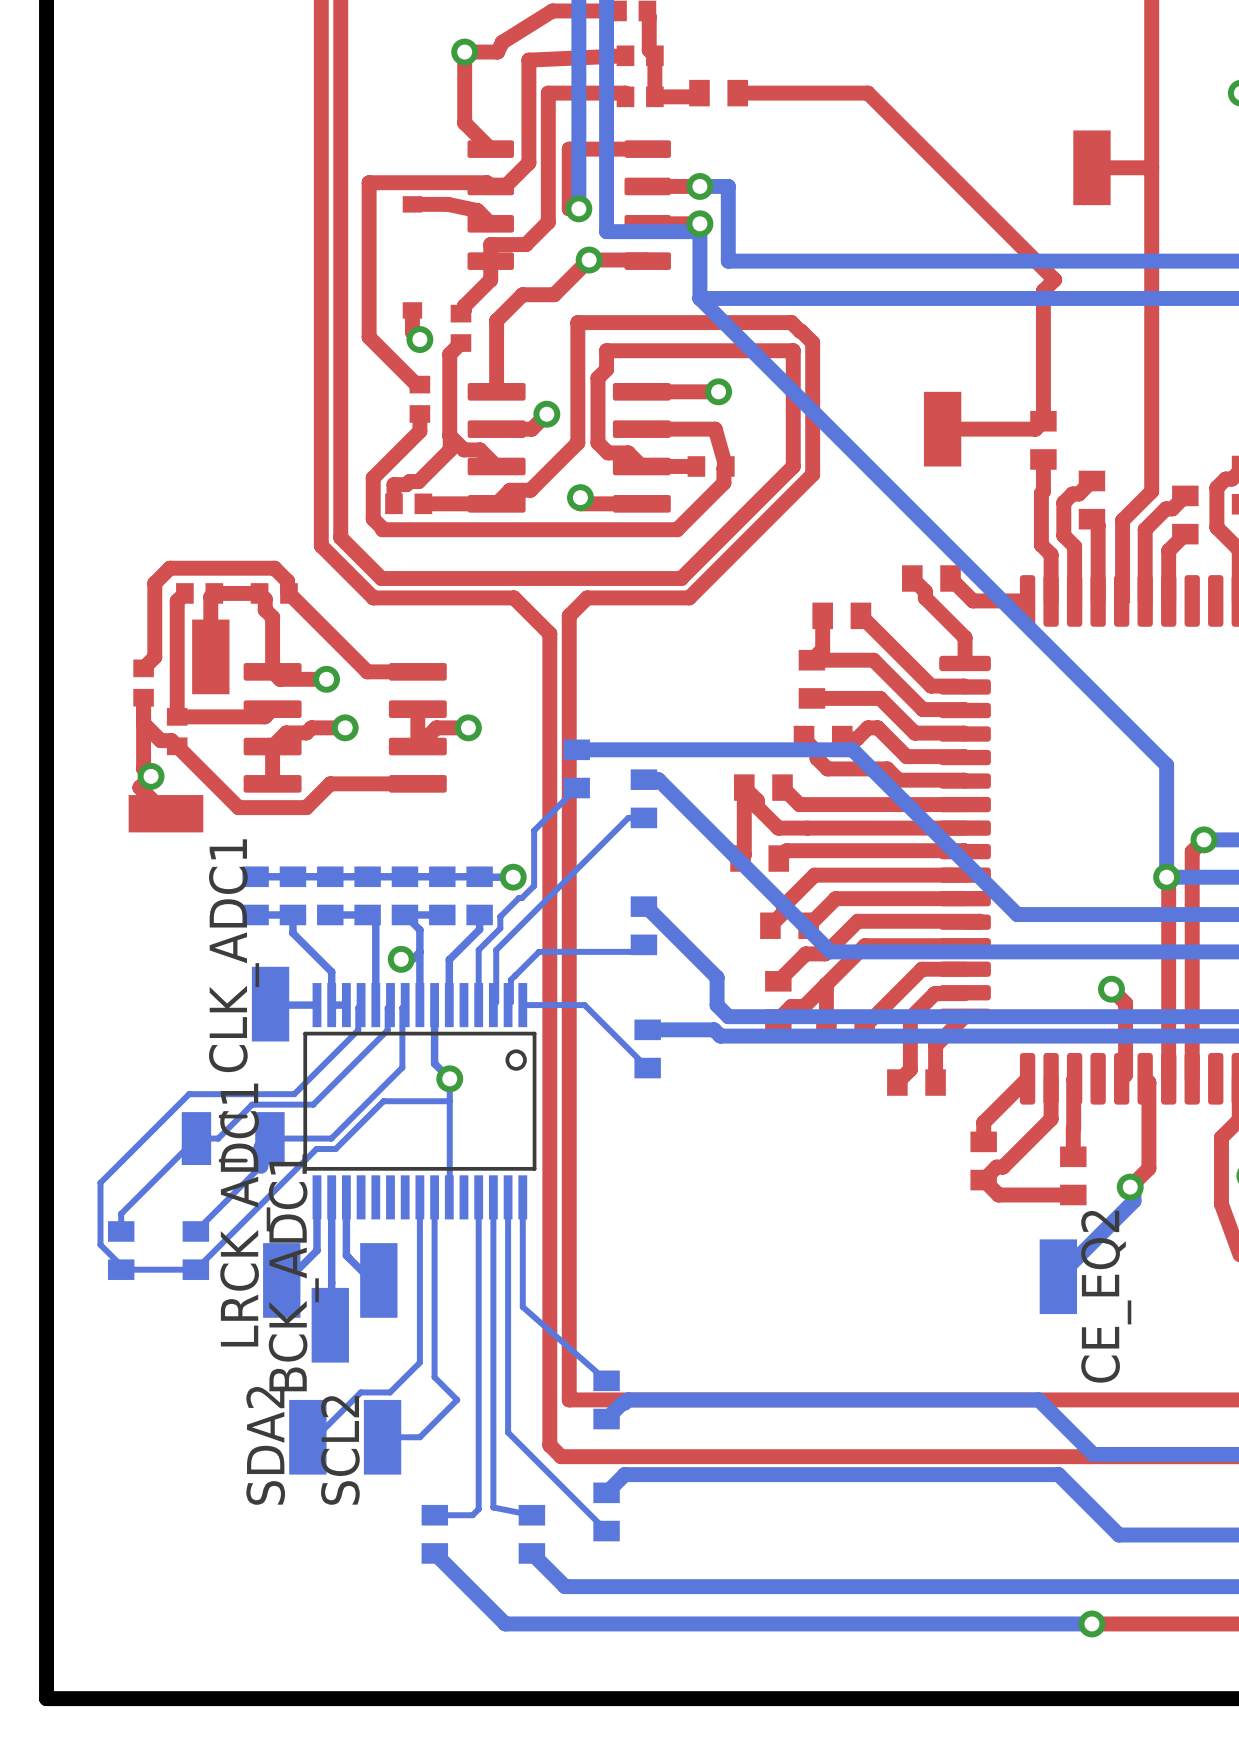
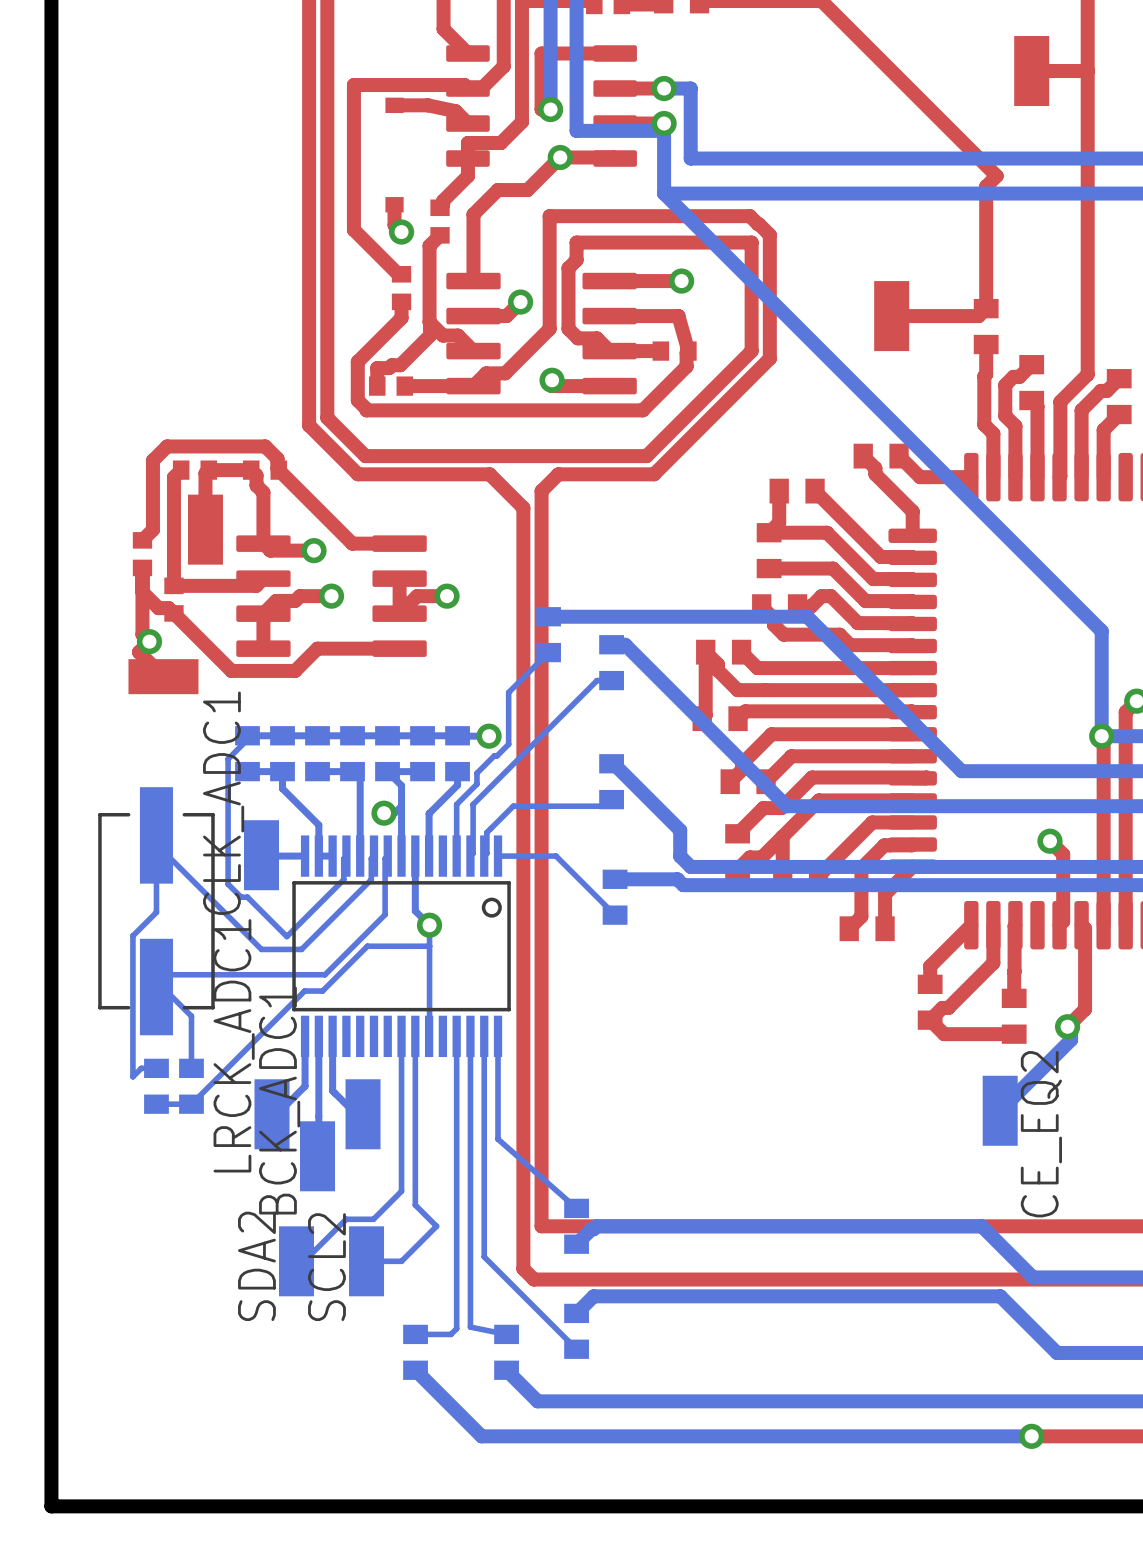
bottom track: none -> (156, 835) (156, 912) (132, 935) (132, 1076) (141, 1068) (156, 1068)
part: none -> (156, 911)
bottom track: (297, 1090) (294, 1094) (189, 1094) (100, 1182) (100, 1244) (121, 1265) (121, 1269) (158, 1269) -> (286, 936) (247, 897) (241, 897) (228, 884) (228, 759) (247, 739) (247, 735)
bottom track: (270, 1104) (252, 1104) (218, 1138) (196, 1138) (121, 1213) (121, 1231) -> (261, 949) (156, 844)
bottom track: (338, 1131) (331, 1138) (269, 1138) (260, 1147) (260, 1166) (195, 1231) -> (325, 974) (168, 974) (156, 987)
part: (233, 1138) -> none
bottom track: none -> (159, 984) (191, 1016) (191, 1068)
part position: (121, 1250) -> (156, 1086)

